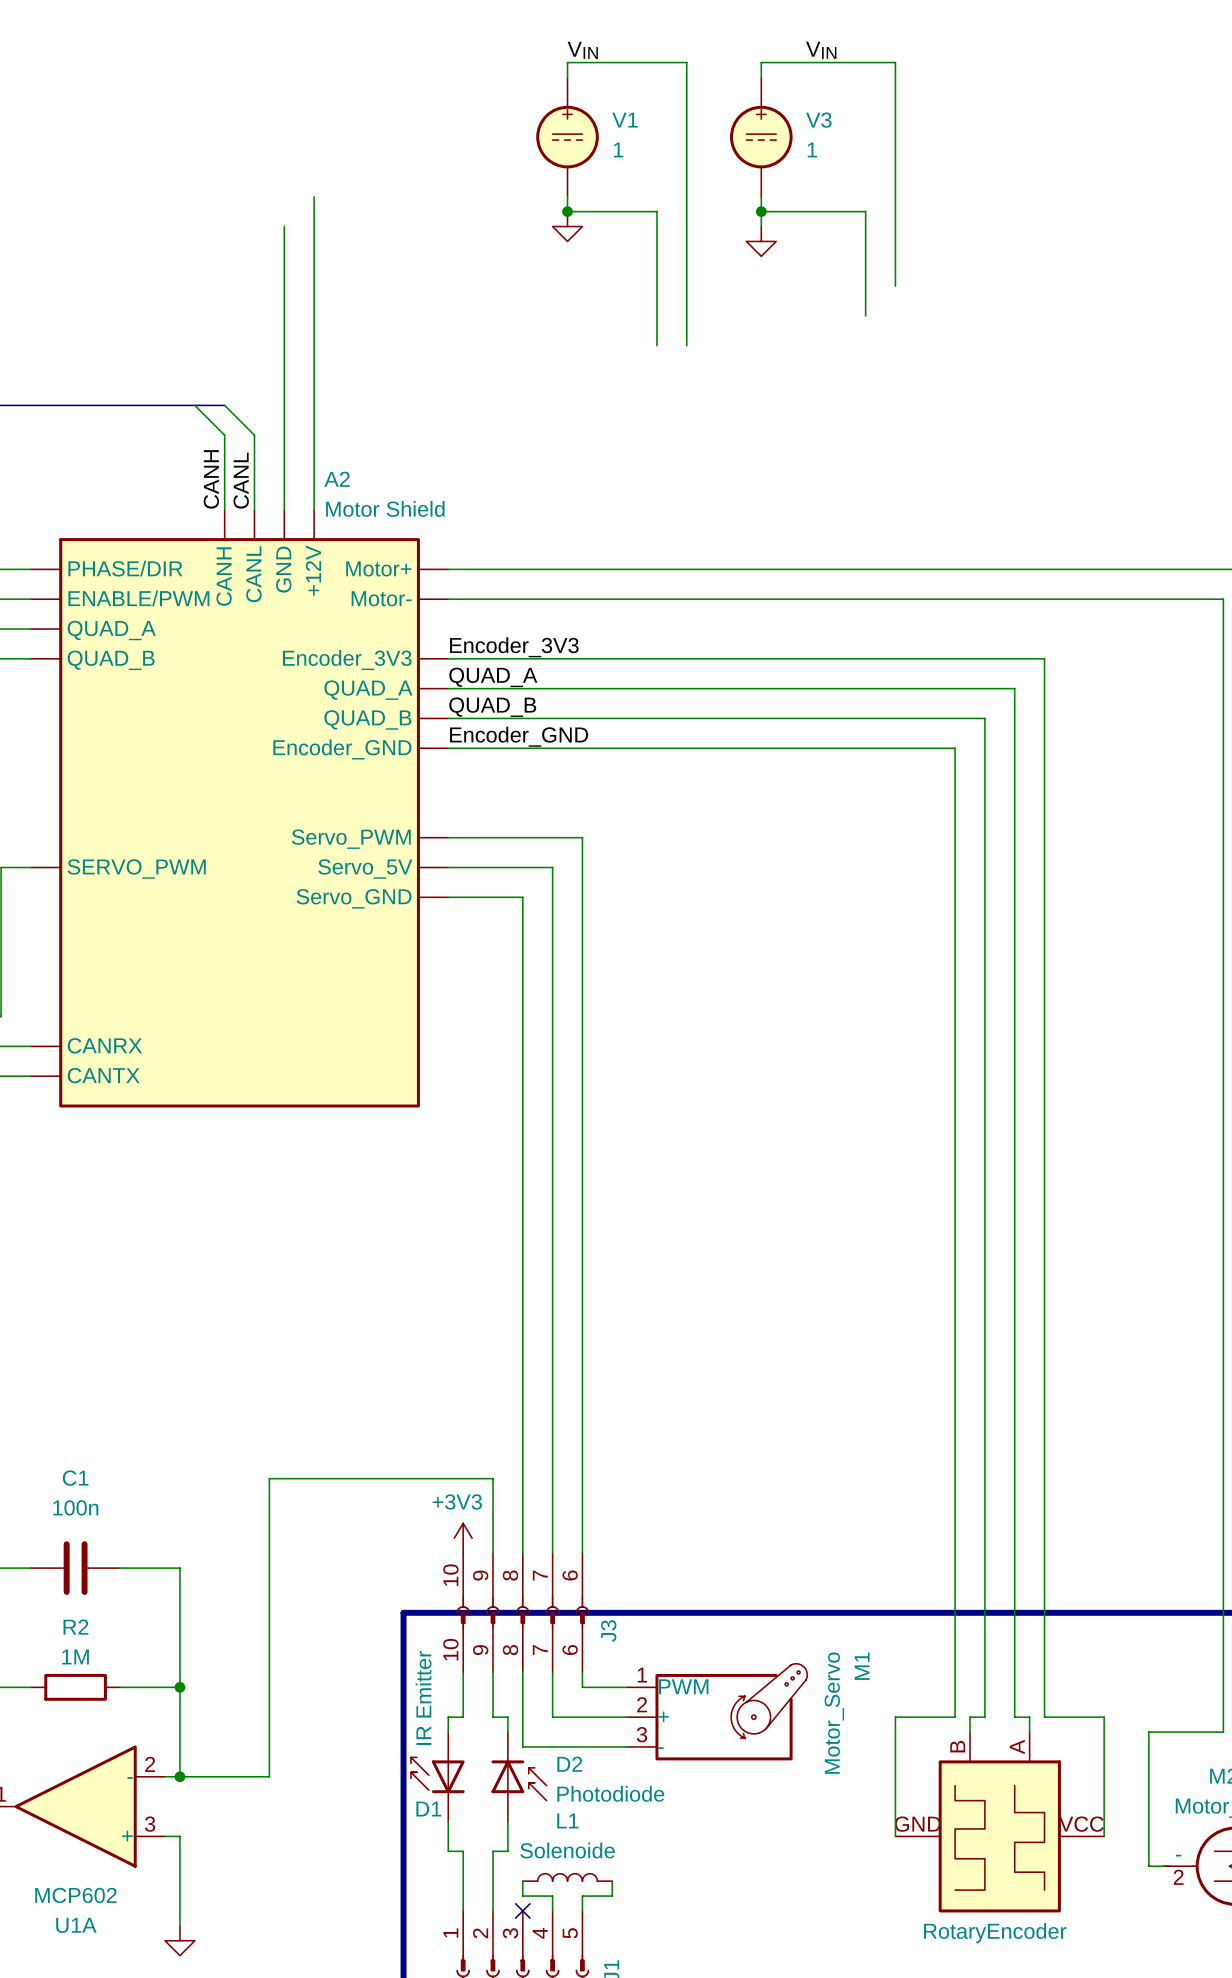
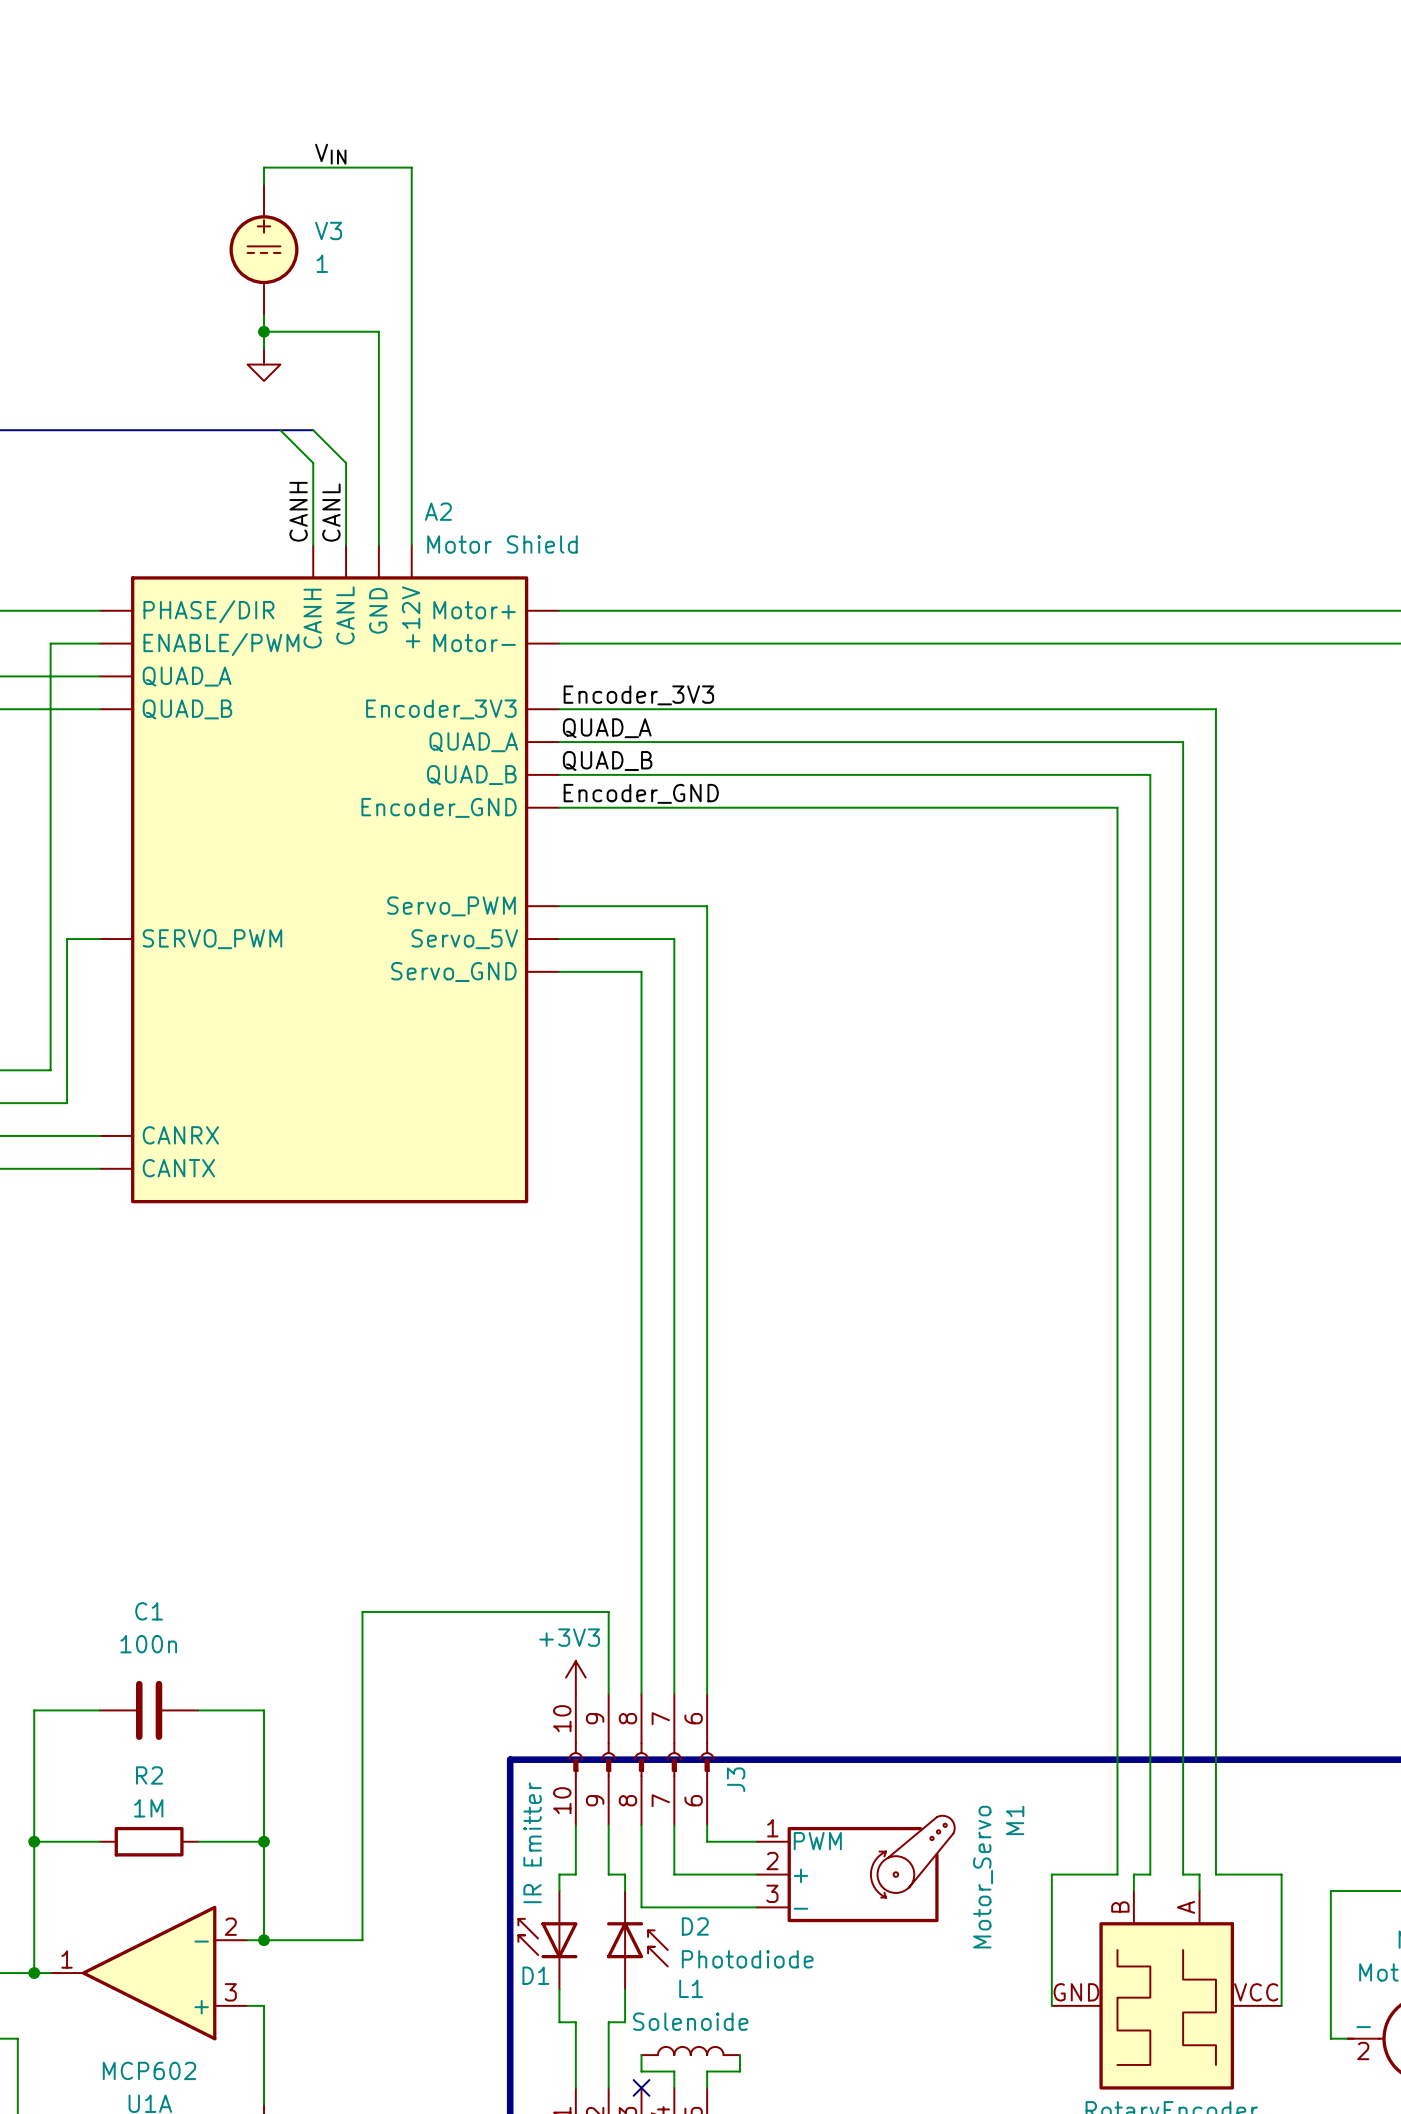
label: VIN (582, 50) -> none
label: VIN (821, 50) -> none
wire: (567, 77) (567, 62) (686, 62) (686, 345) -> none
wire: (761, 77) (761, 62) (895, 62) (895, 286) -> none
V1: 1 (567, 137) -> none
V3 position: (761, 137) -> (264, 249)
label: none -> VIN (330, 154)
wire: none -> (264, 184) (264, 167) (411, 167) (411, 200)
wire: (567, 196) (567, 211) (656, 211) (656, 345) -> none
wire: (761, 196) (761, 226) -> none
junction: (567, 211) -> none
wire: (761, 211) (865, 211) (865, 315) -> none
junction: (761, 211) -> none
wire: (284, 226) (284, 315) -> (264, 331) (378, 331)
power symbol: (567, 226) -> none
power symbol: (761, 241) -> none
wire: none -> (264, 315) (264, 348)
junction: none -> (264, 331)
power symbol: none -> (264, 364)

